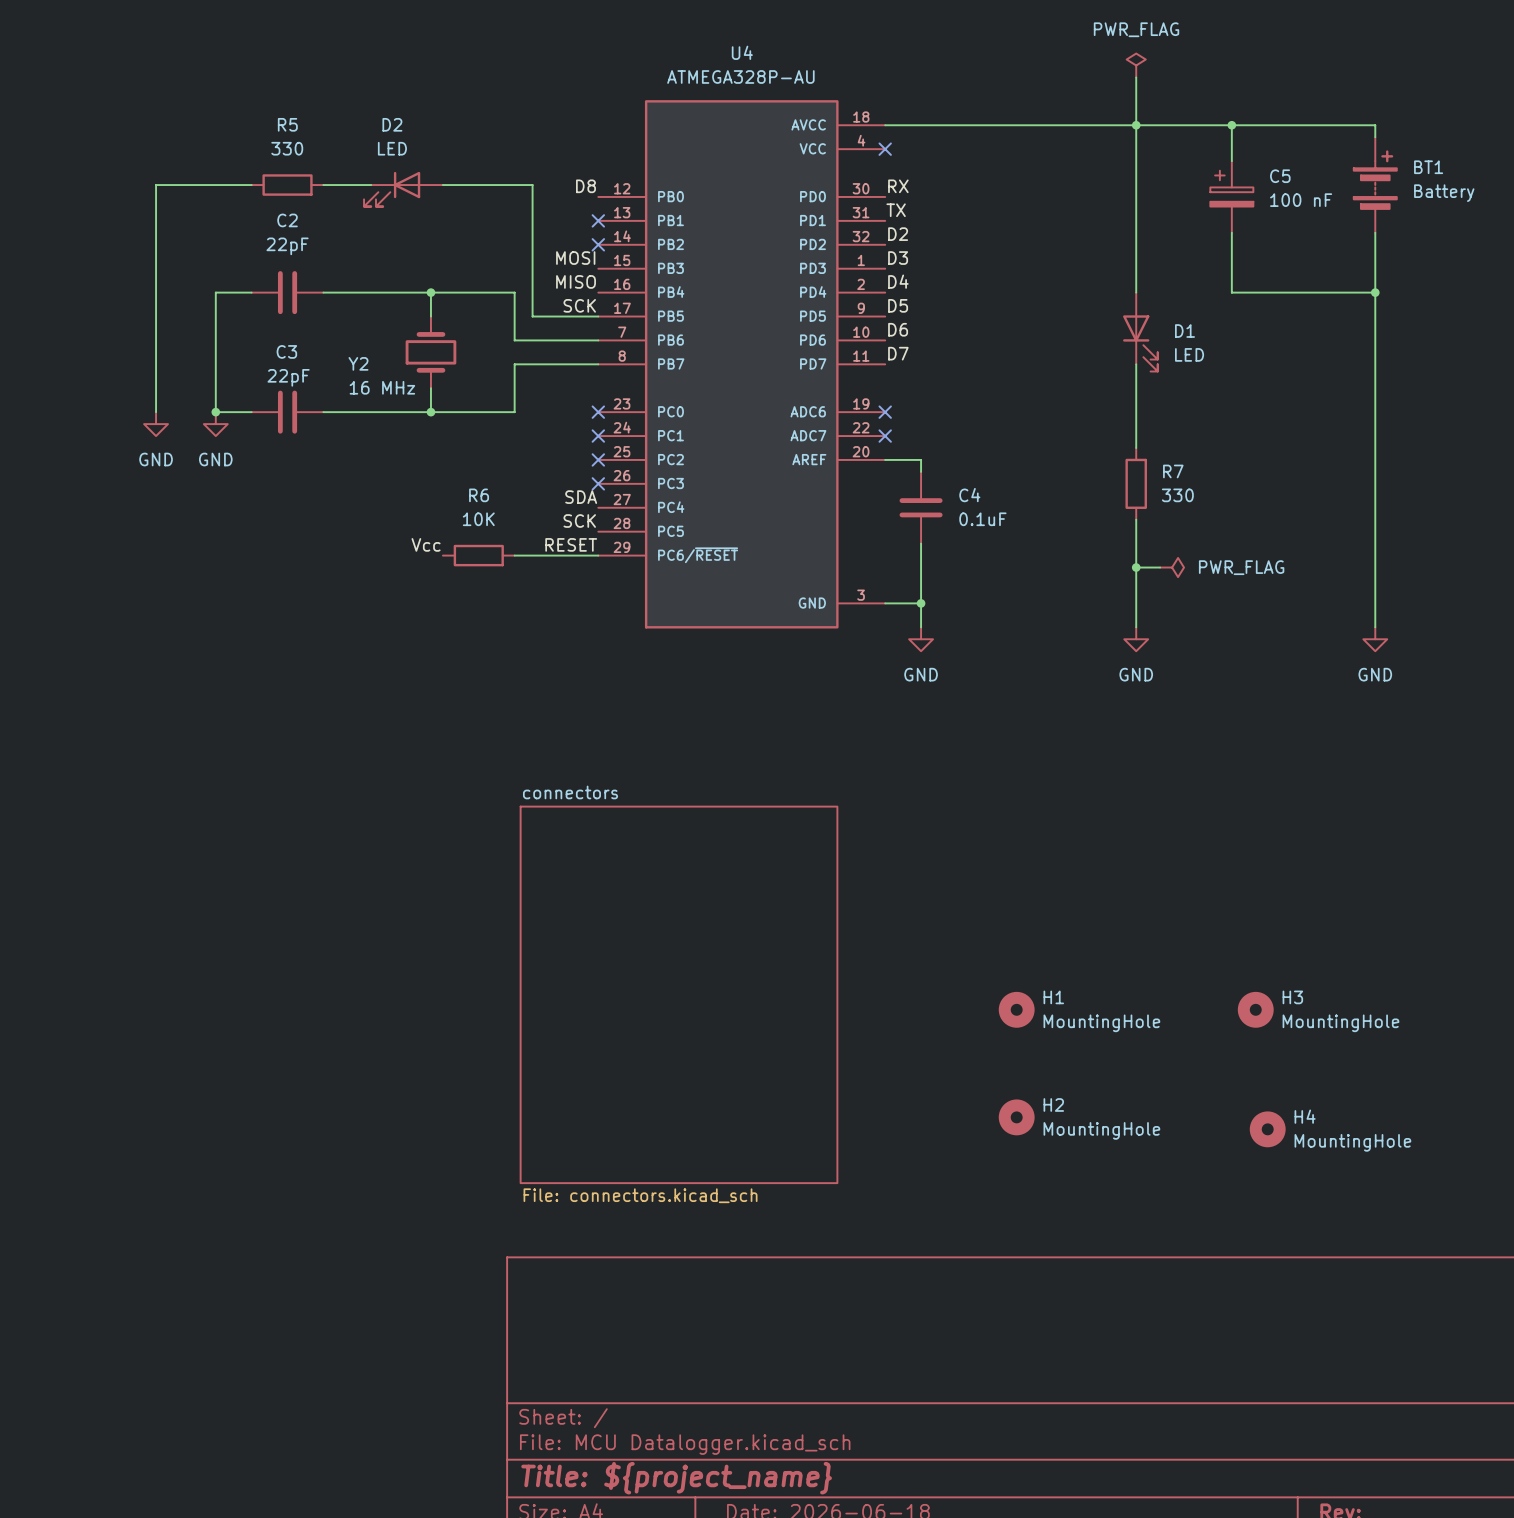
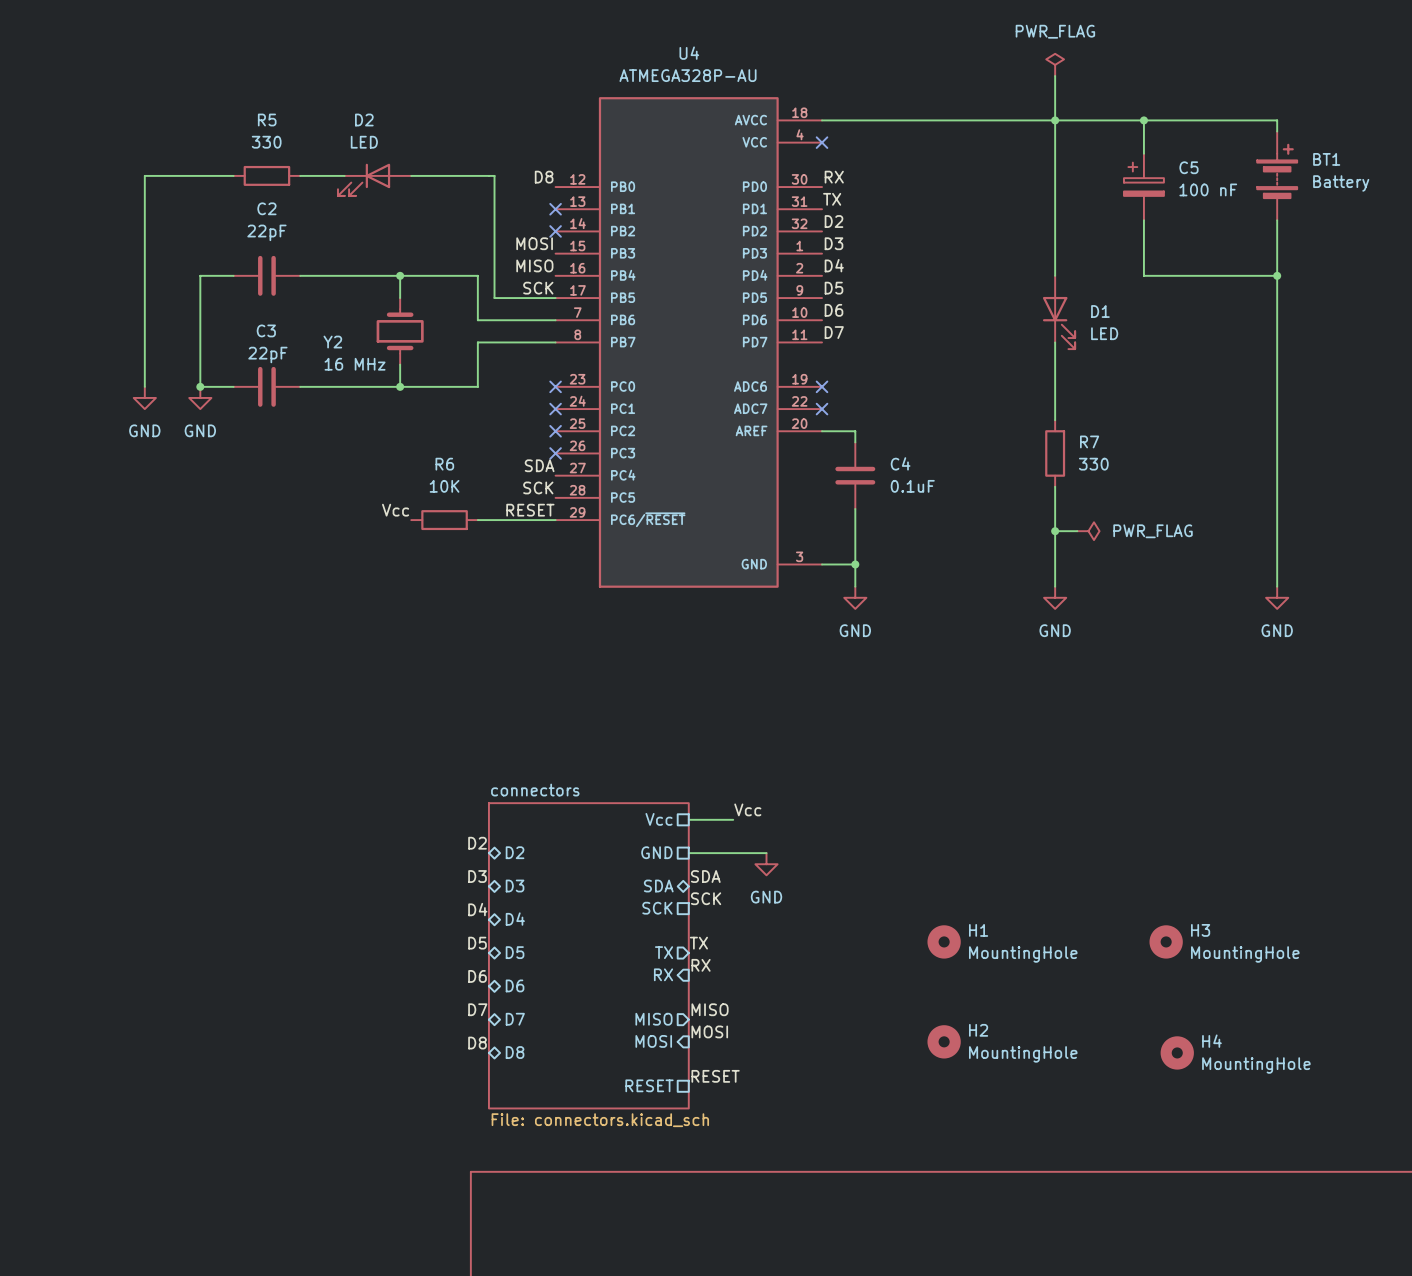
label: none -> Vcc (747, 809)
sheet pin: none -> Vcc (659, 819)
wire: none -> (688, 819) (733, 819)
label: none -> D2 (477, 843)
sheet pin: none -> D2 (515, 852)
sheet pin: none -> GND (656, 852)
wire: none -> (688, 853) (766, 853)
power symbol: none -> GND (766, 864)
label: none -> D3 (477, 876)
label: none -> SDA (705, 876)
sheet pin: none -> D3 (515, 886)
sheet pin: none -> SDA (658, 886)
label: none -> SCK (706, 898)
sheet pin: none -> SCK (657, 908)
label: none -> D4 (477, 909)
sheet pin: none -> D4 (515, 919)
sheet connectors: File: connectors.kicad_sch (679, 994) -> none
label: none -> D5 (477, 943)
label: none -> TX (698, 943)
sheet pin: none -> D5 (515, 952)
sheet pin: none -> TX (664, 952)
sheet connectors: none -> File: connectors.kicad_sch (588, 955)
label: none -> RX (701, 965)
sheet pin: none -> RX (663, 974)
label: none -> D6 (477, 976)
sheet pin: none -> D6 (515, 985)
label: none -> D7 (477, 1009)
label: none -> MISO (710, 1009)
sheet pin: none -> D7 (515, 1019)
sheet pin: none -> MISO (653, 1019)
label: none -> MOSI (709, 1031)
sheet pin: none -> MOSI (653, 1041)
label: none -> D8 (477, 1043)
sheet pin: none -> D8 (515, 1052)
label: none -> RESET (715, 1076)
sheet pin: none -> RESET (649, 1085)

